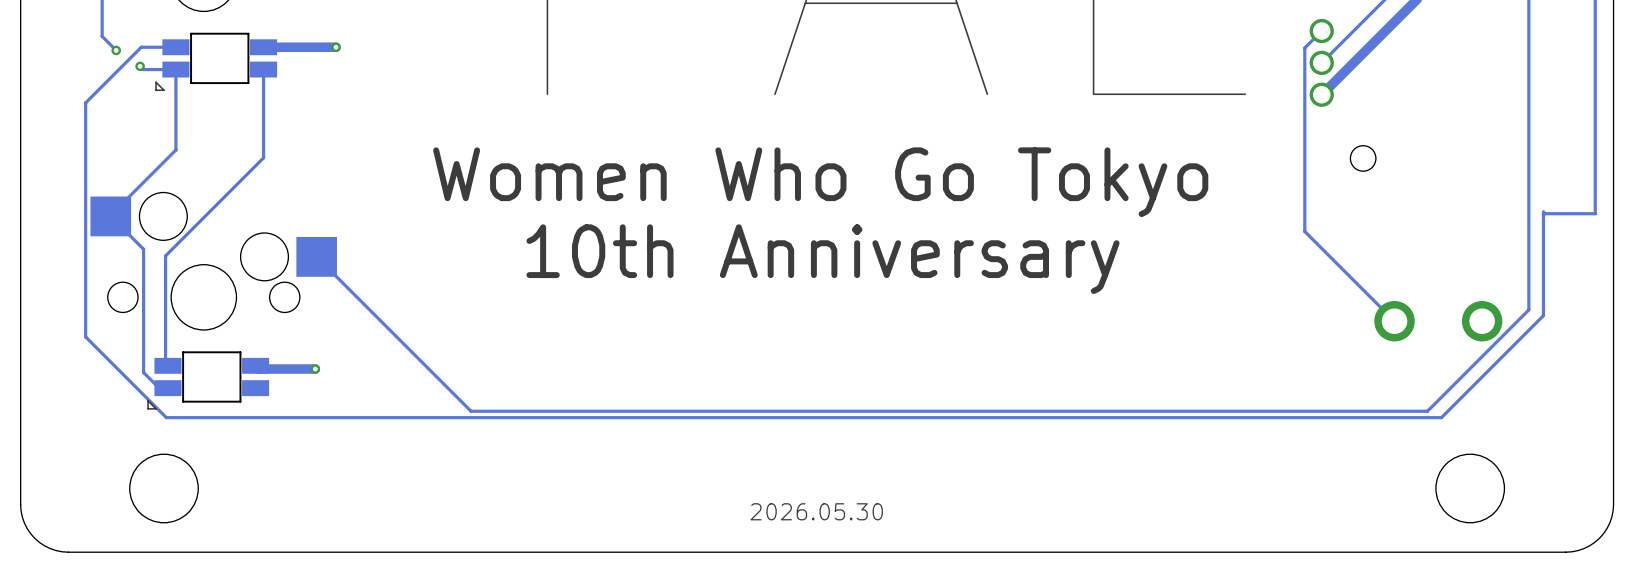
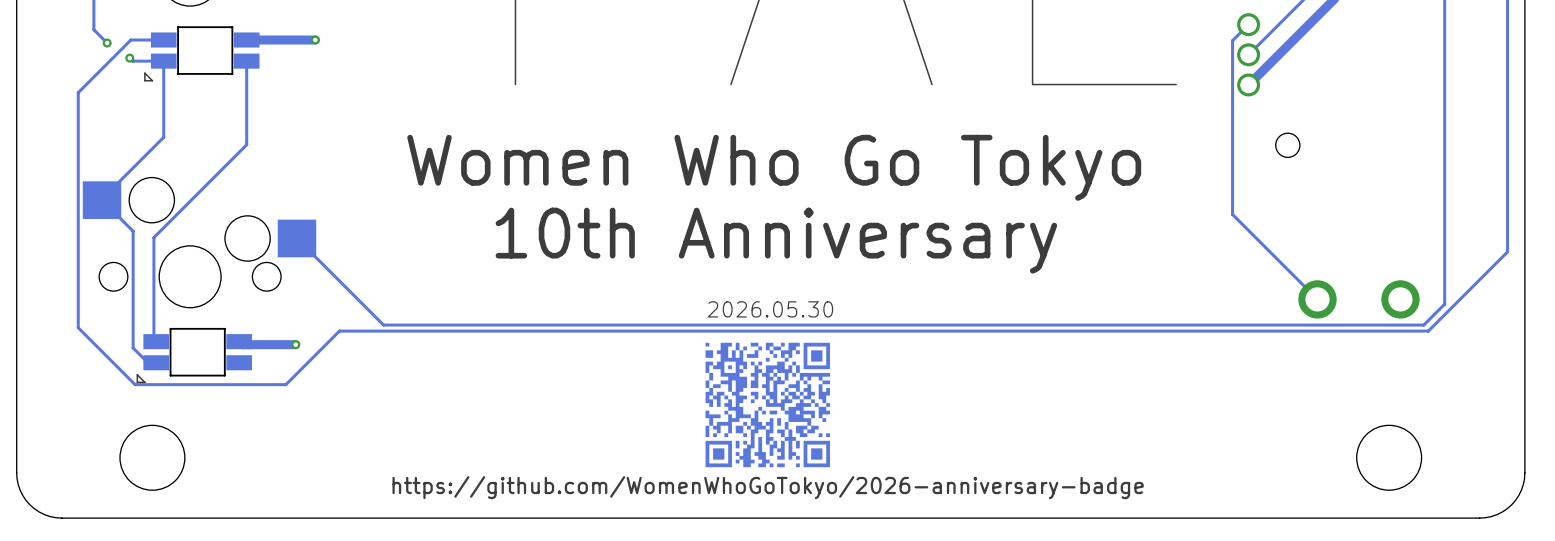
track: (1595, 213) (1545, 213) (1543, 212) (1543, 315) (1441, 417) (166, 417) (85, 336) -> (1507, 197) (1507, 251) (1428, 331) (339, 331) (285, 384) (135, 384) (78, 327) (78, 314)
track: (1528, 309) (1427, 411) (471, 411) (408, 348) -> (1444, 288) (1444, 304) (1423, 325) (383, 325)
part: none -> https://github.com/WomenWhoGoTokyo/2026-anniversary-badge (767, 404)
text position: 2026.05.30 (816, 511) -> 2026.05.30 (770, 309)

